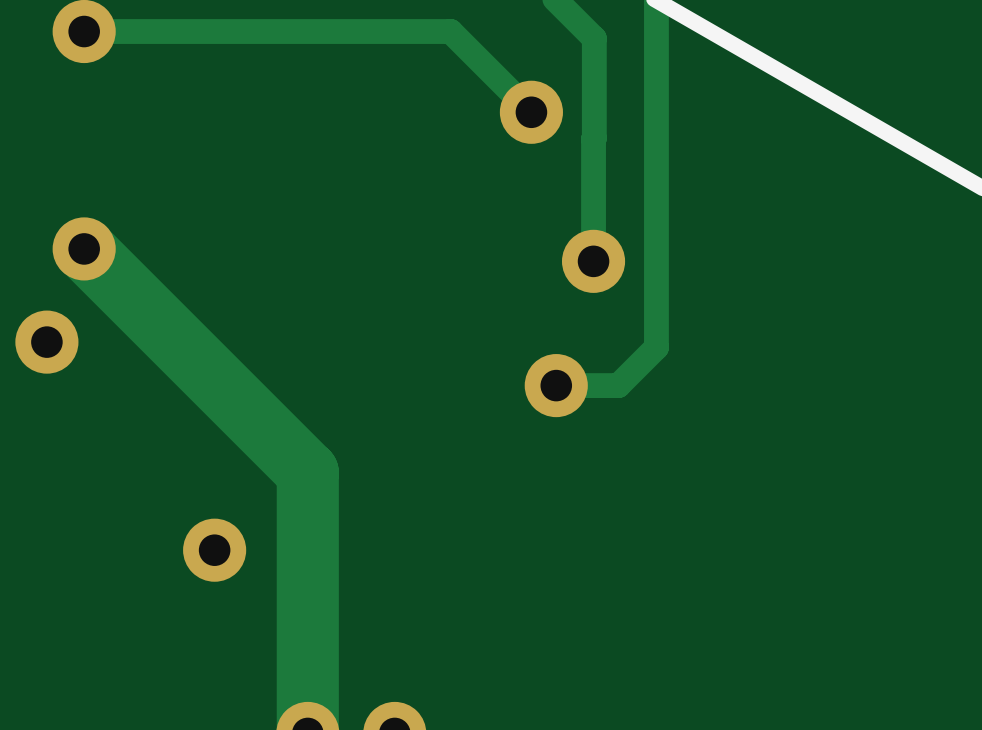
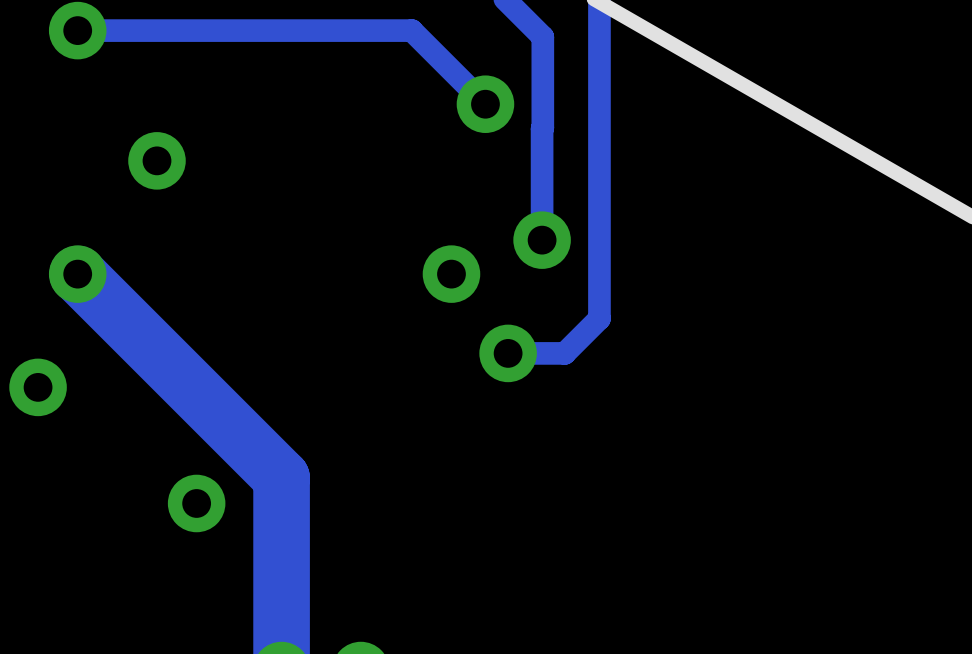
via: none -> (156, 160)
track: (84, 248) (307, 472) (307, 522) -> (77, 274) (281, 477)
via: (84, 248) -> none
via: none -> (77, 274)
via: none -> (451, 274)
via: (46, 342) -> none
via: none -> (38, 387)

